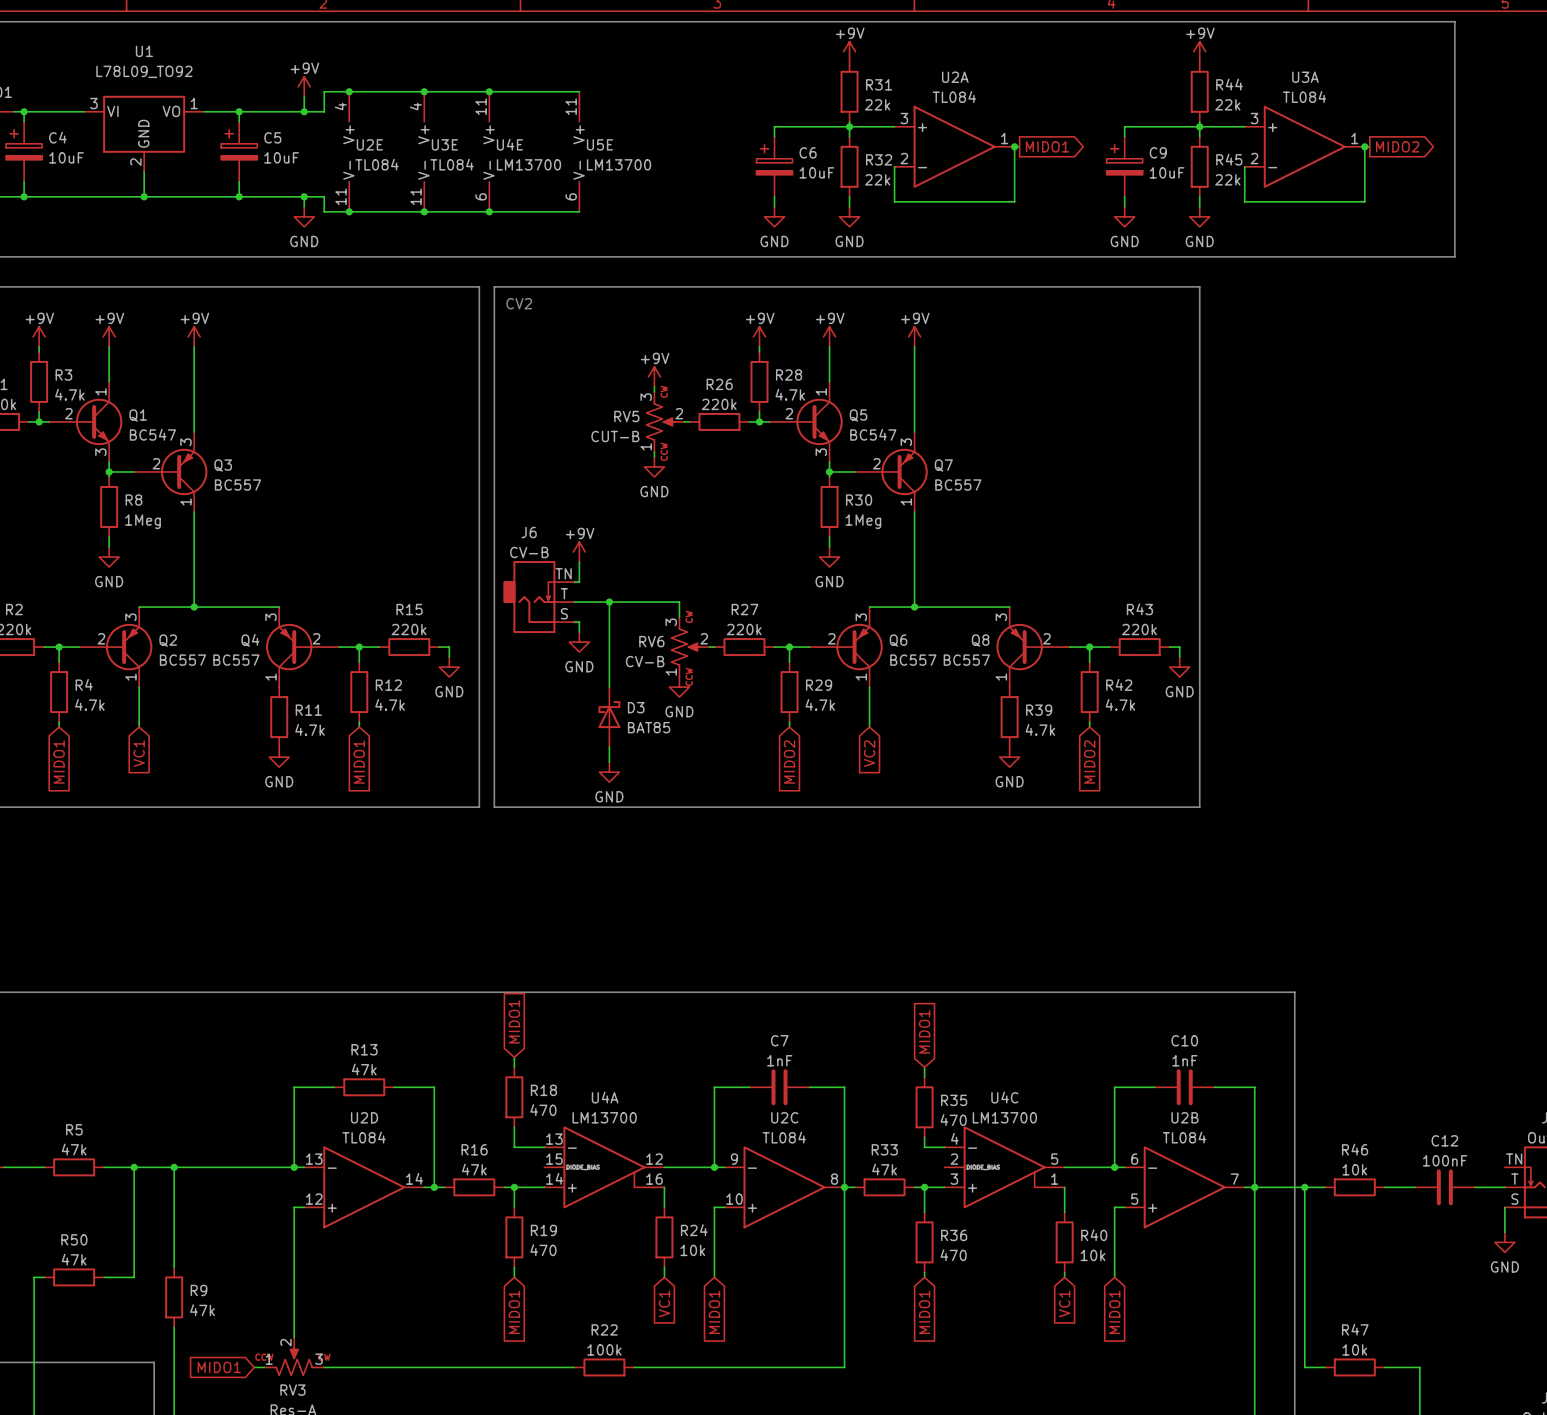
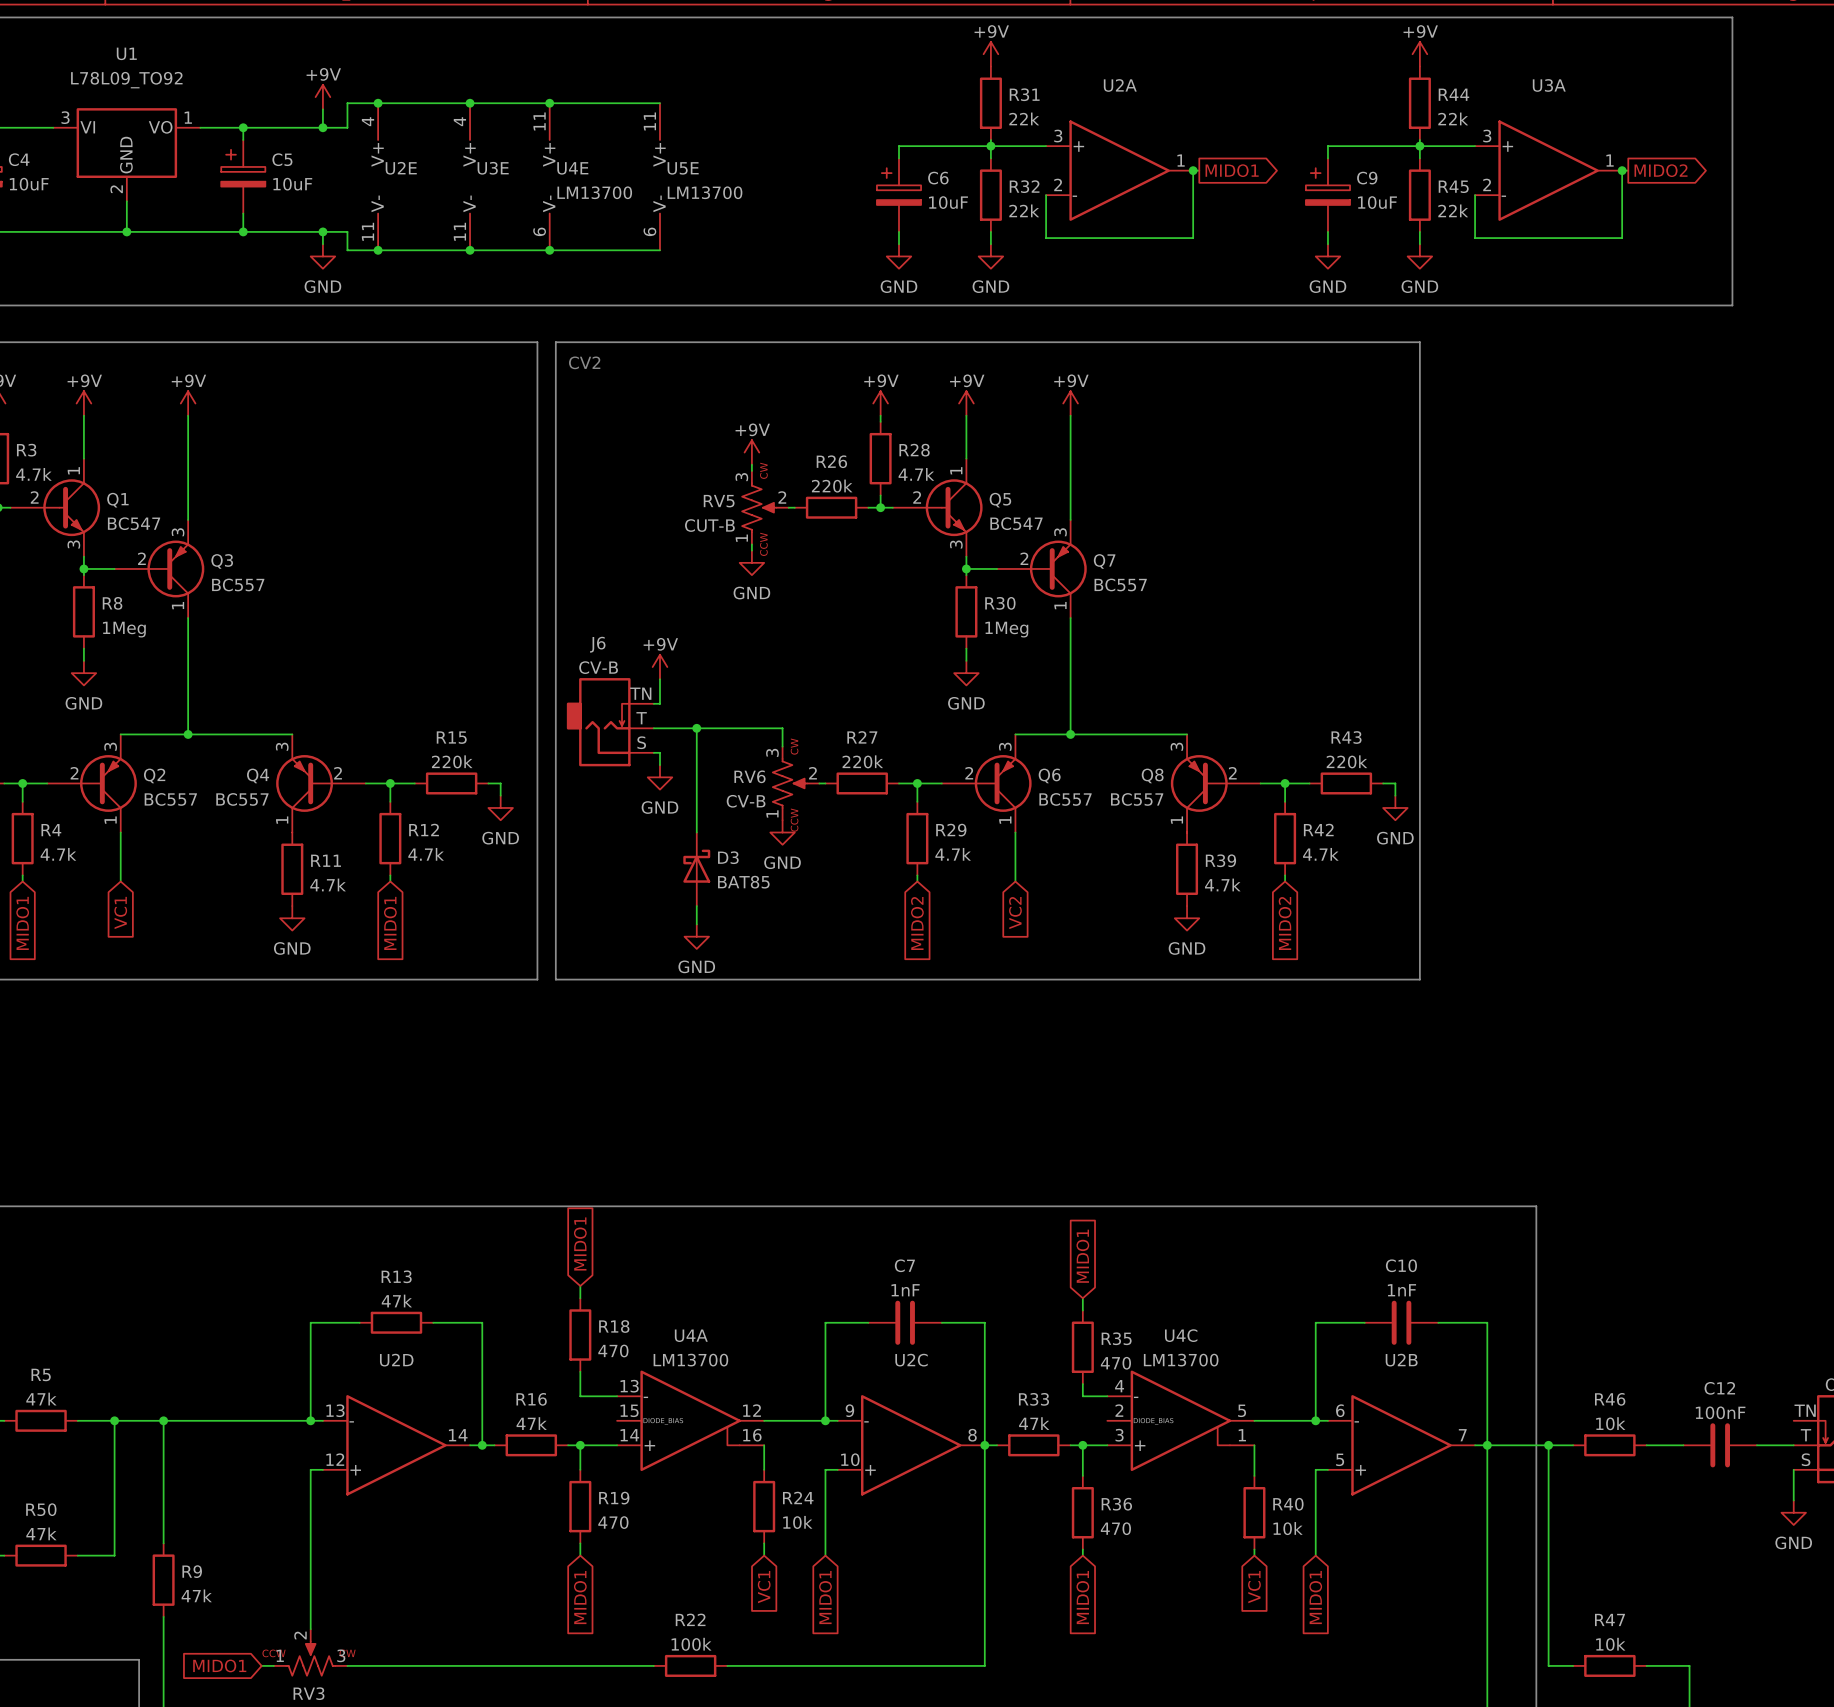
U2A value: TL084 (954, 97) -> none
U3A value: TL084 (1304, 97) -> none
U2E value: TL084 (376, 164) -> none
U3E value: TL084 (452, 164) -> none
U2D value: TL084 (364, 1137) -> none
U2C value: TL084 (784, 1137) -> none
U2B value: TL084 (1184, 1137) -> none

